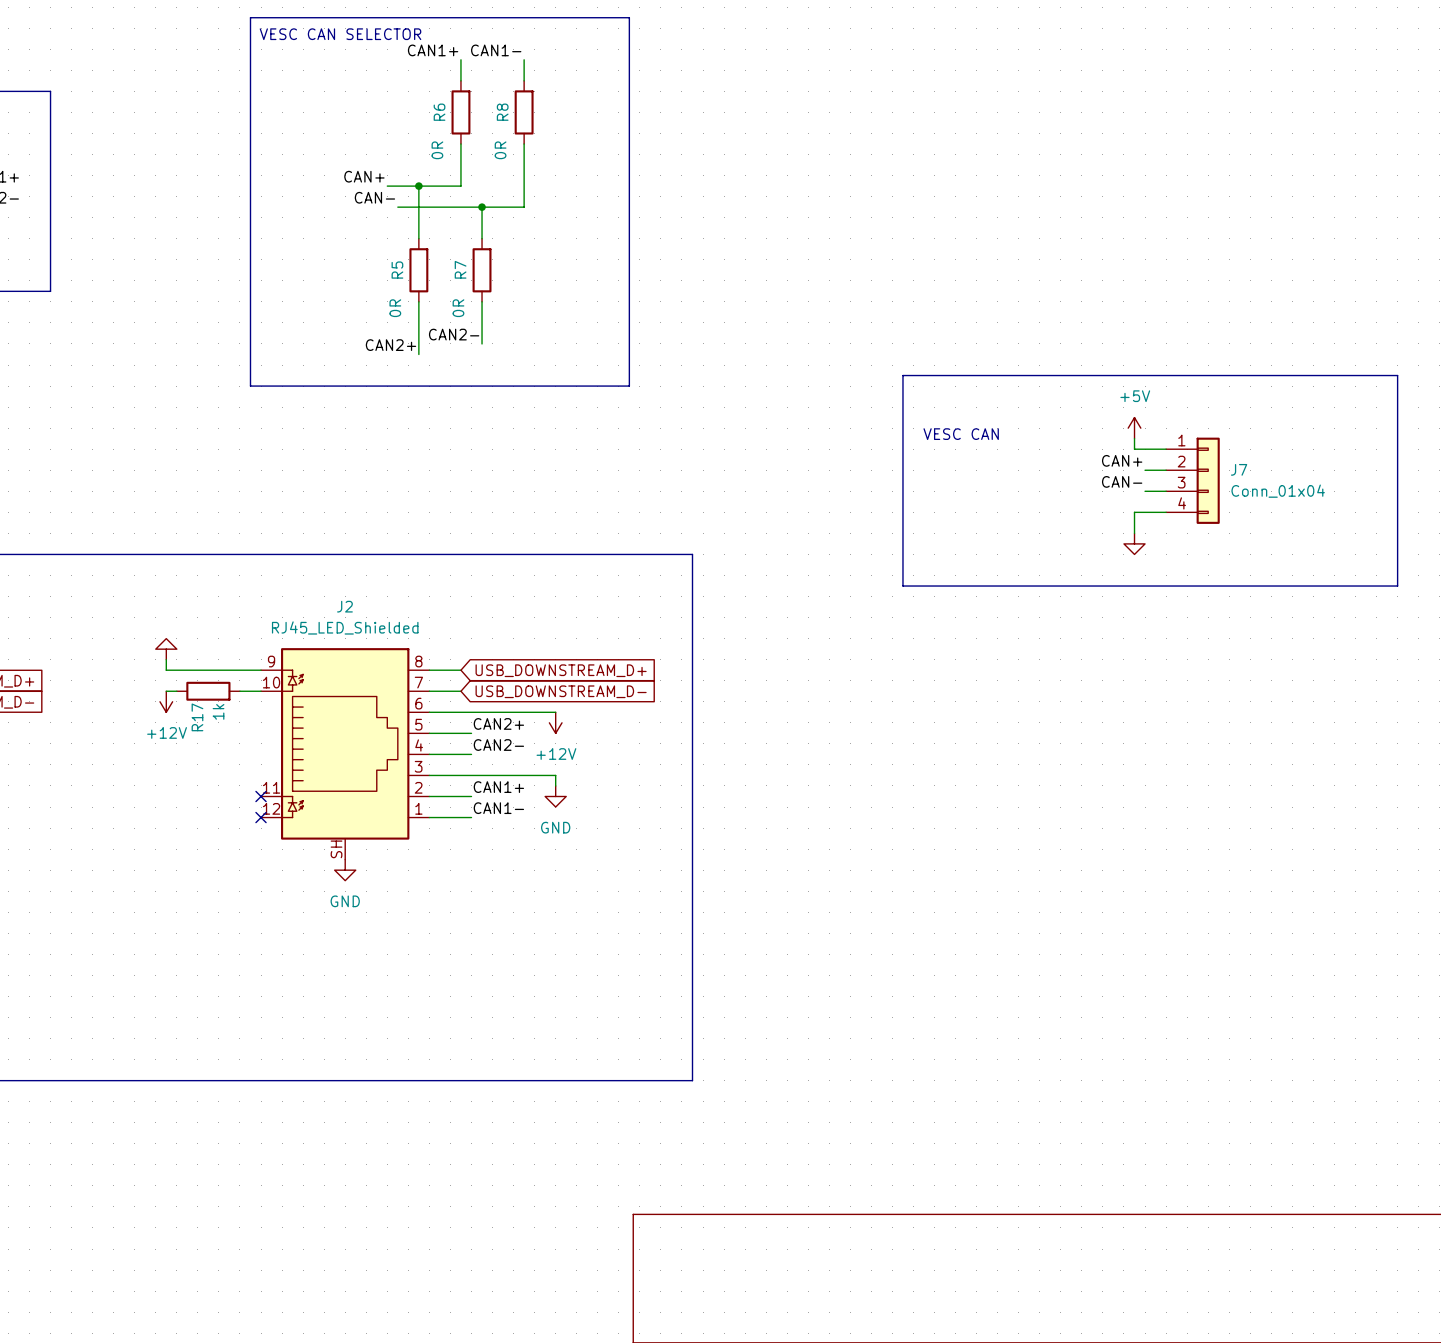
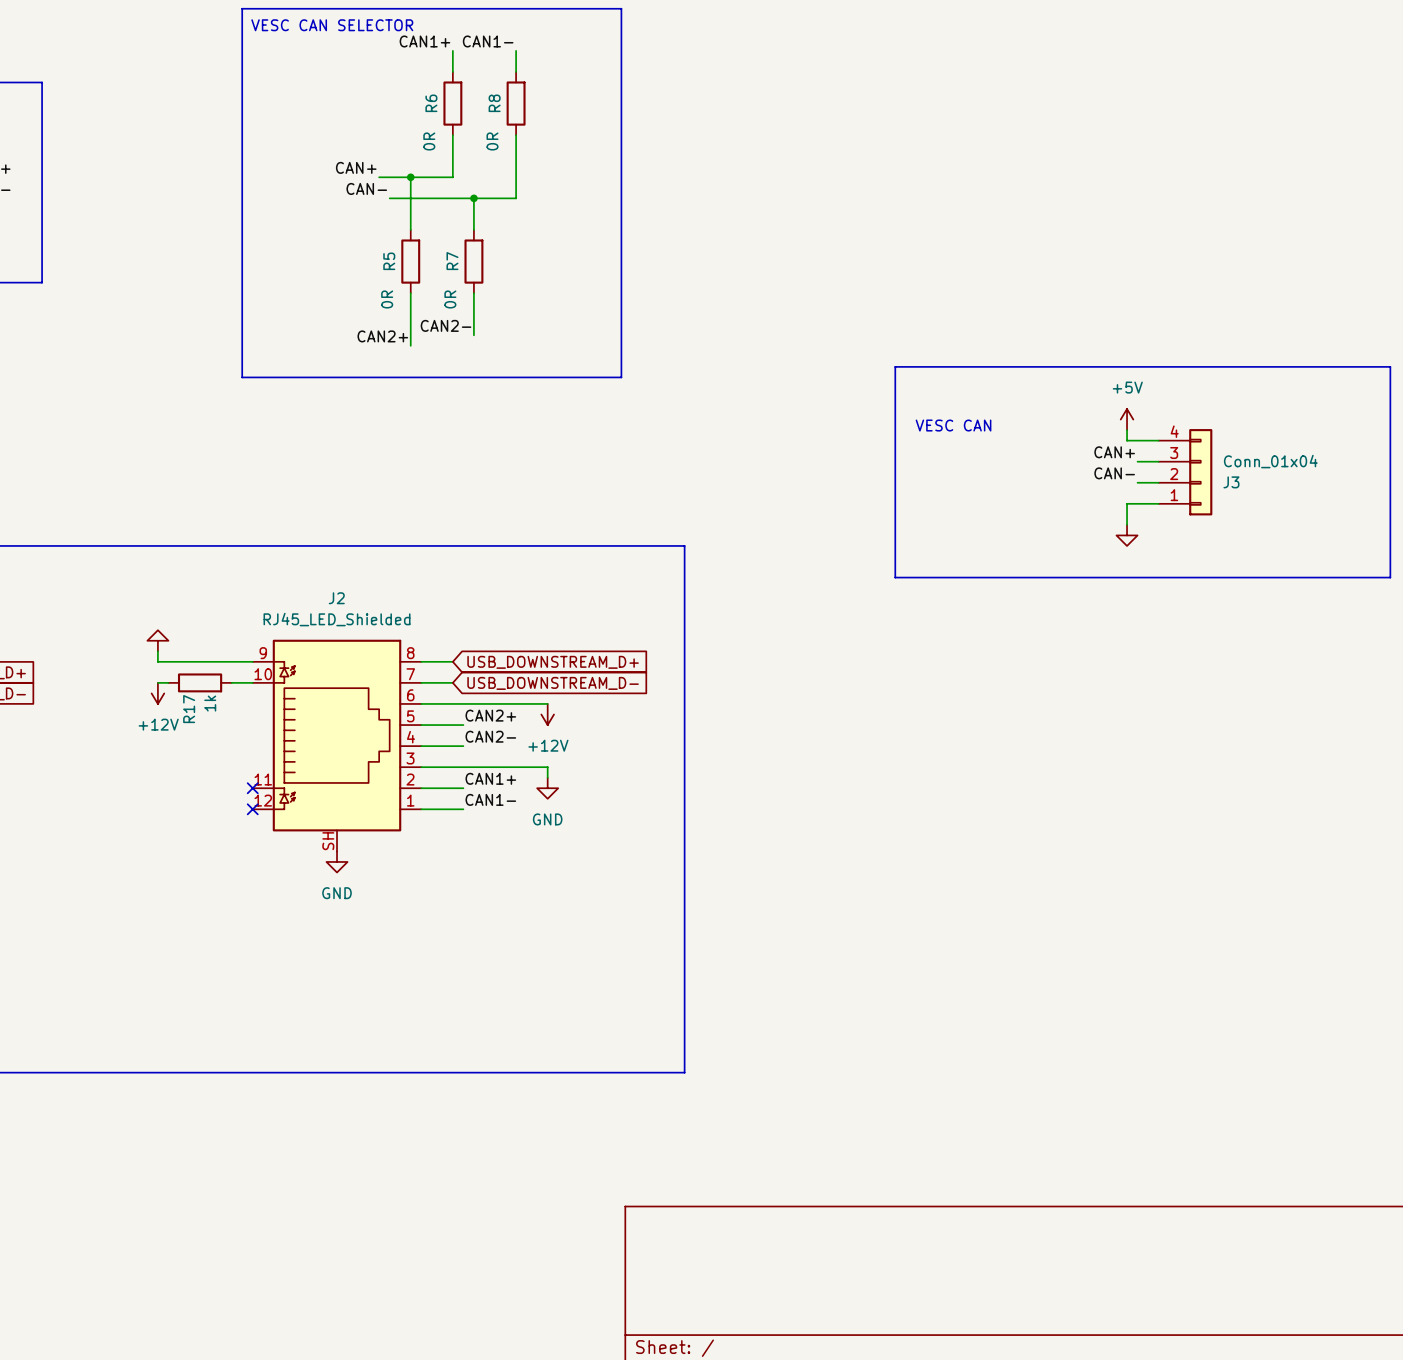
J7 name: J7 (1239, 469) -> J3 (1231, 482)
J7 flip: as is (1208, 480) -> up-down (1200, 472)

